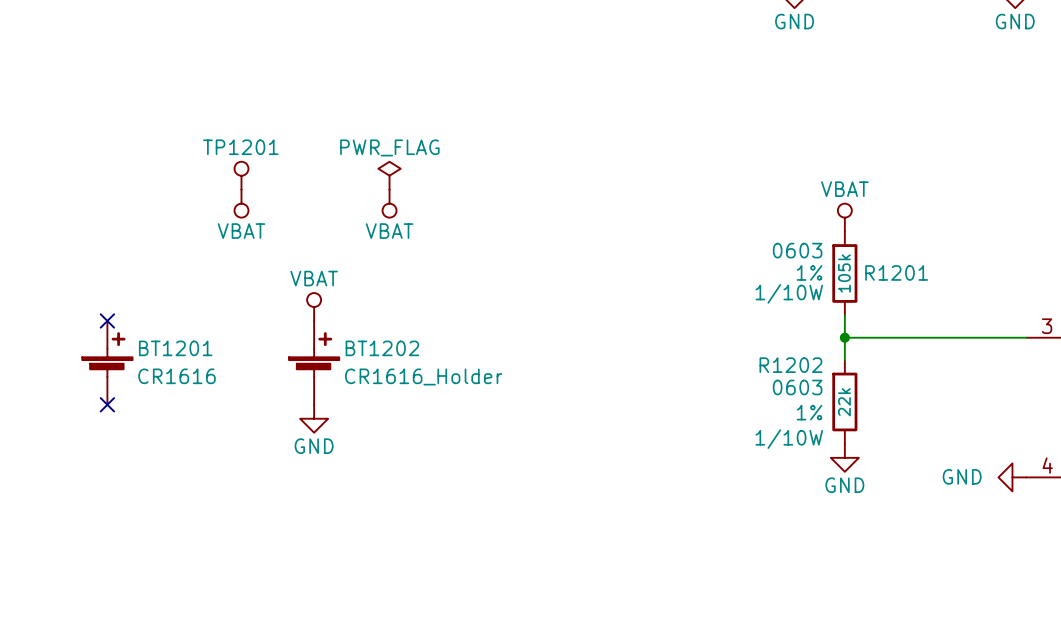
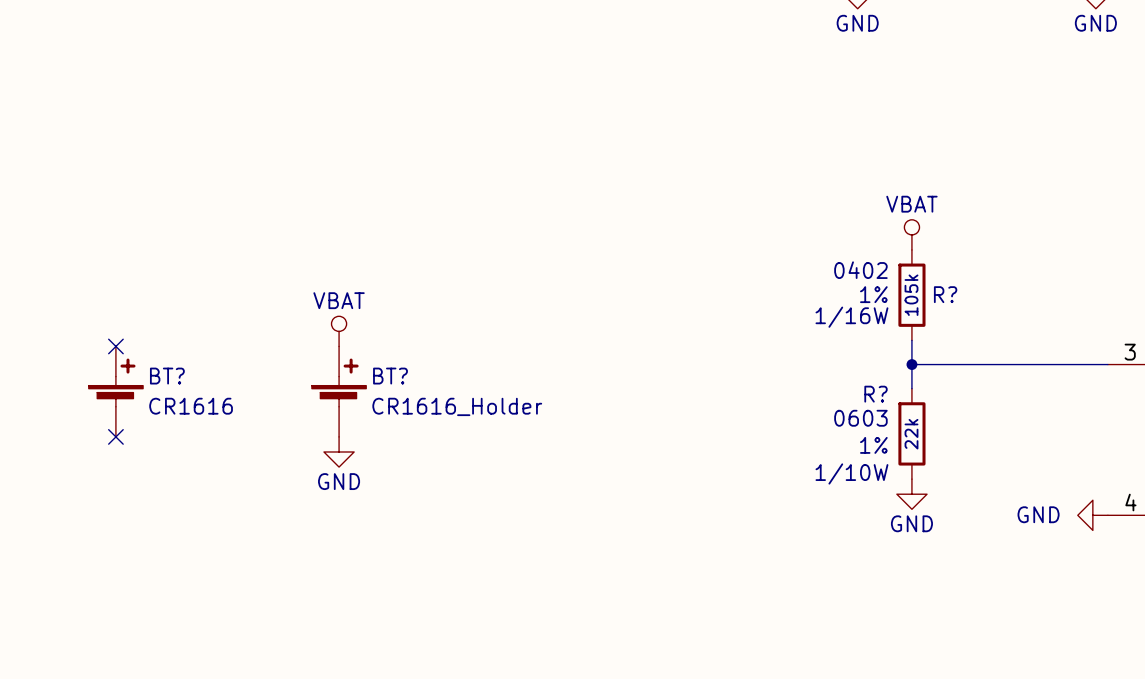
TP1201: (241, 175) -> none
power symbol: PWR_FLAG (389, 175) -> none
power symbol: VBAT (241, 203) -> none
power symbol: VBAT (389, 203) -> none
R1201 text: 0603 (797, 250) -> 0402 (860, 270)
R1201 name: R1201 (896, 272) -> R? (945, 294)
R1201 text: 1/10W (789, 293) -> 1/16W (851, 317)
BT1201 name: BT1201 (175, 348) -> BT? (167, 376)
BT1202 name: BT1202 (382, 348) -> BT? (390, 376)
R1202 name: R1202 (790, 365) -> R? (876, 394)

